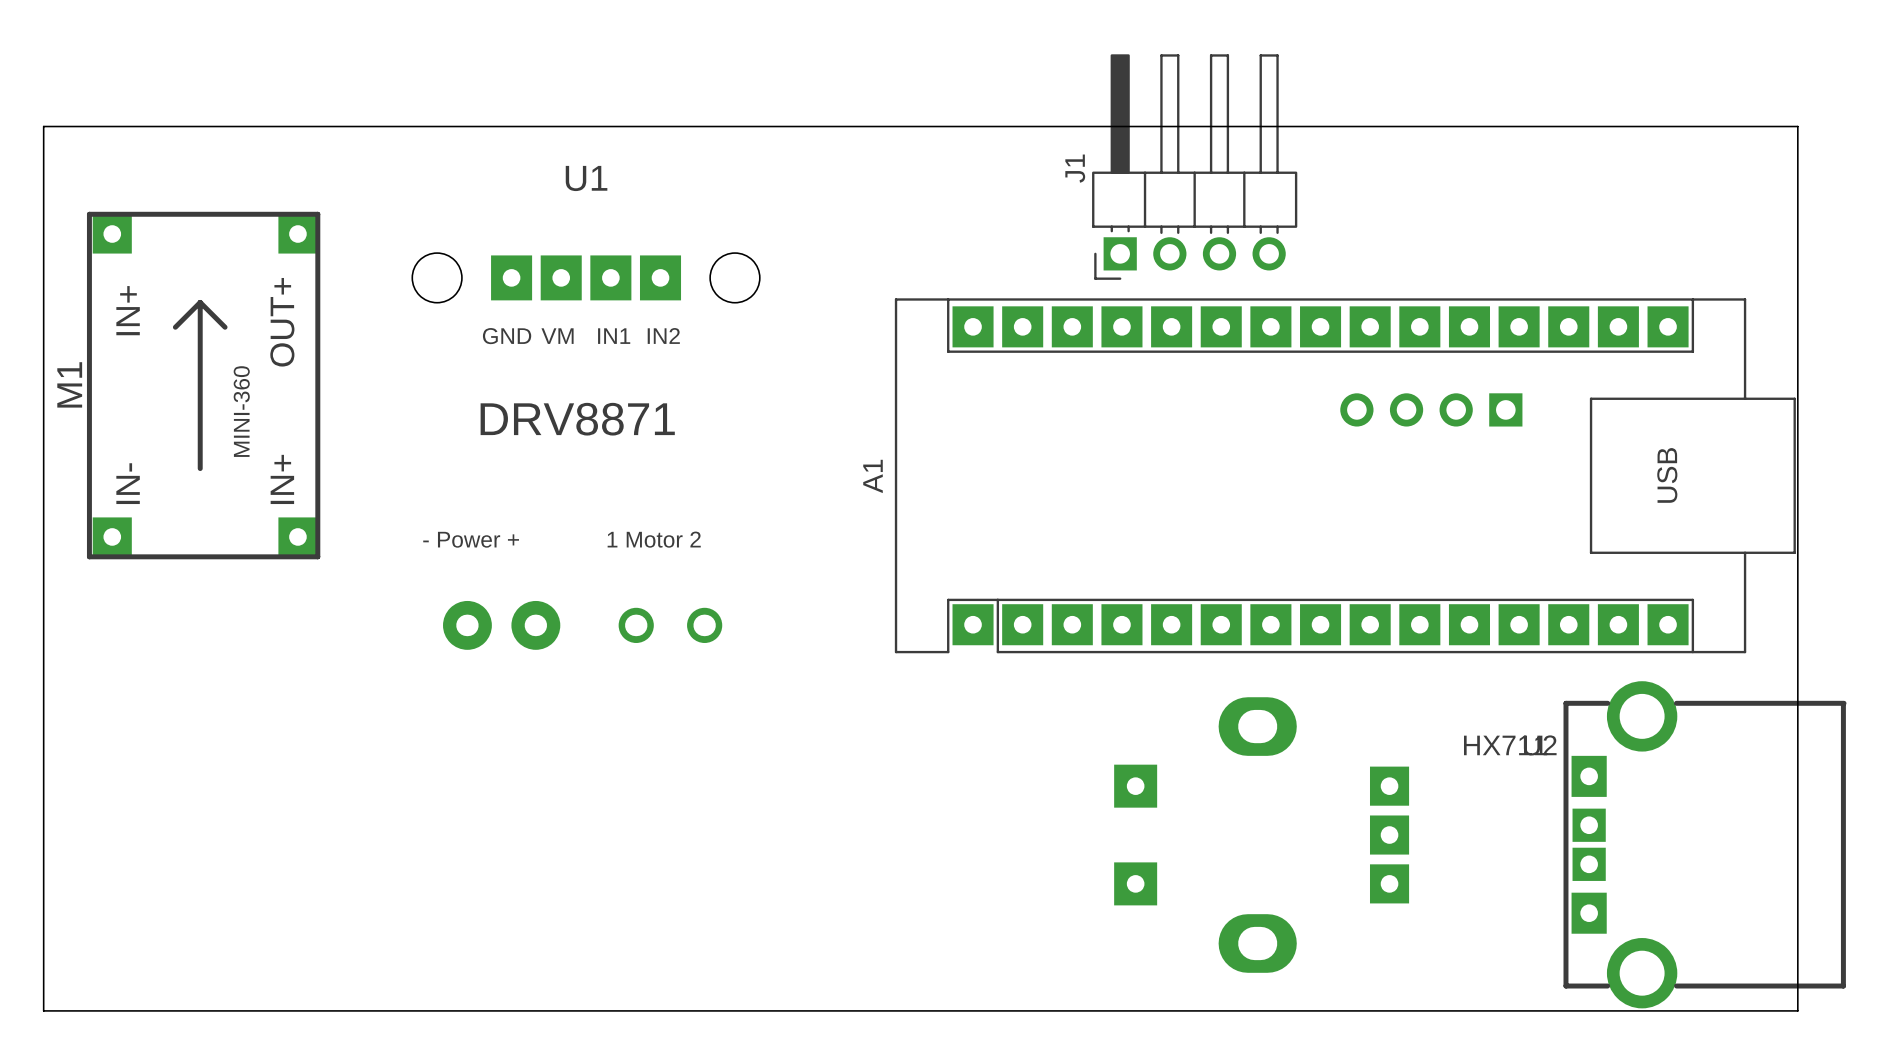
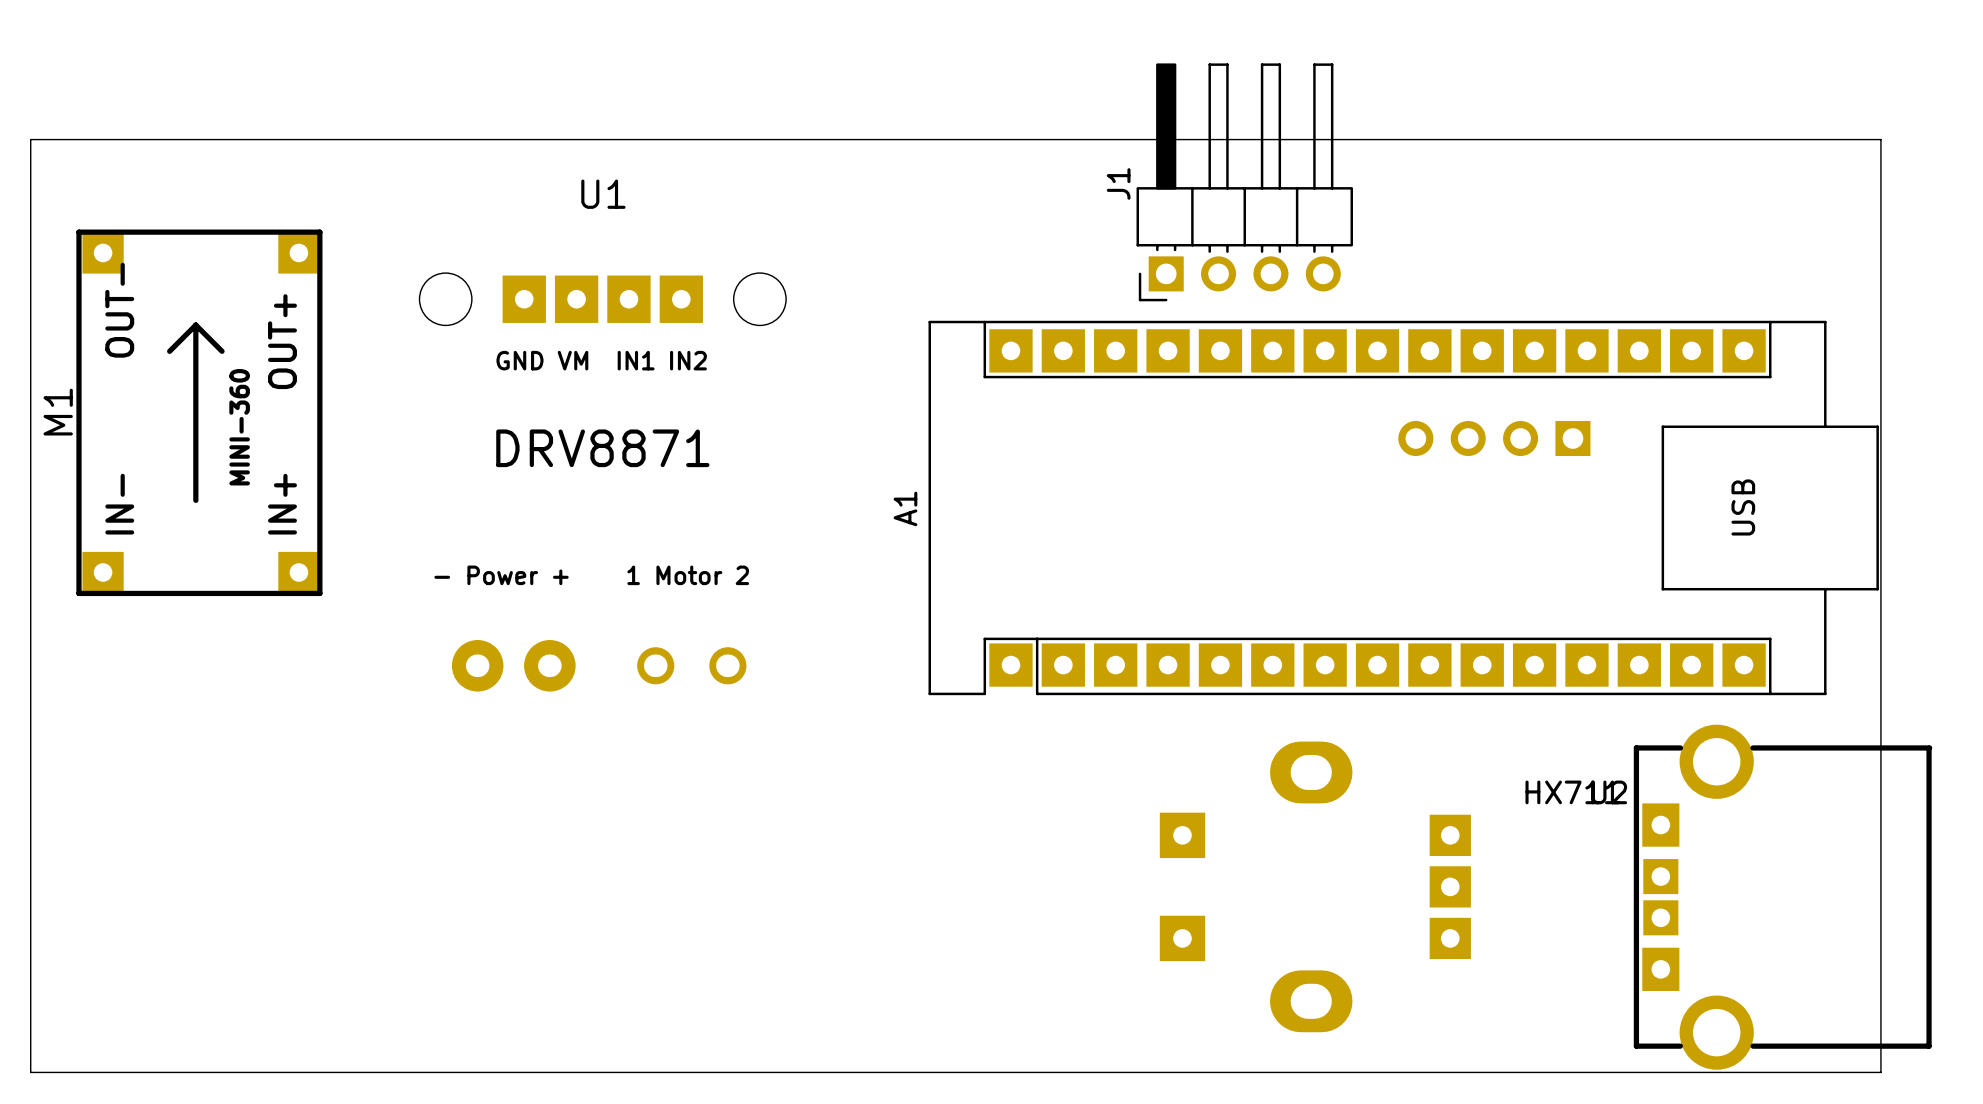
M1 text: IN+ (128, 310) -> OUT- (119, 310)

